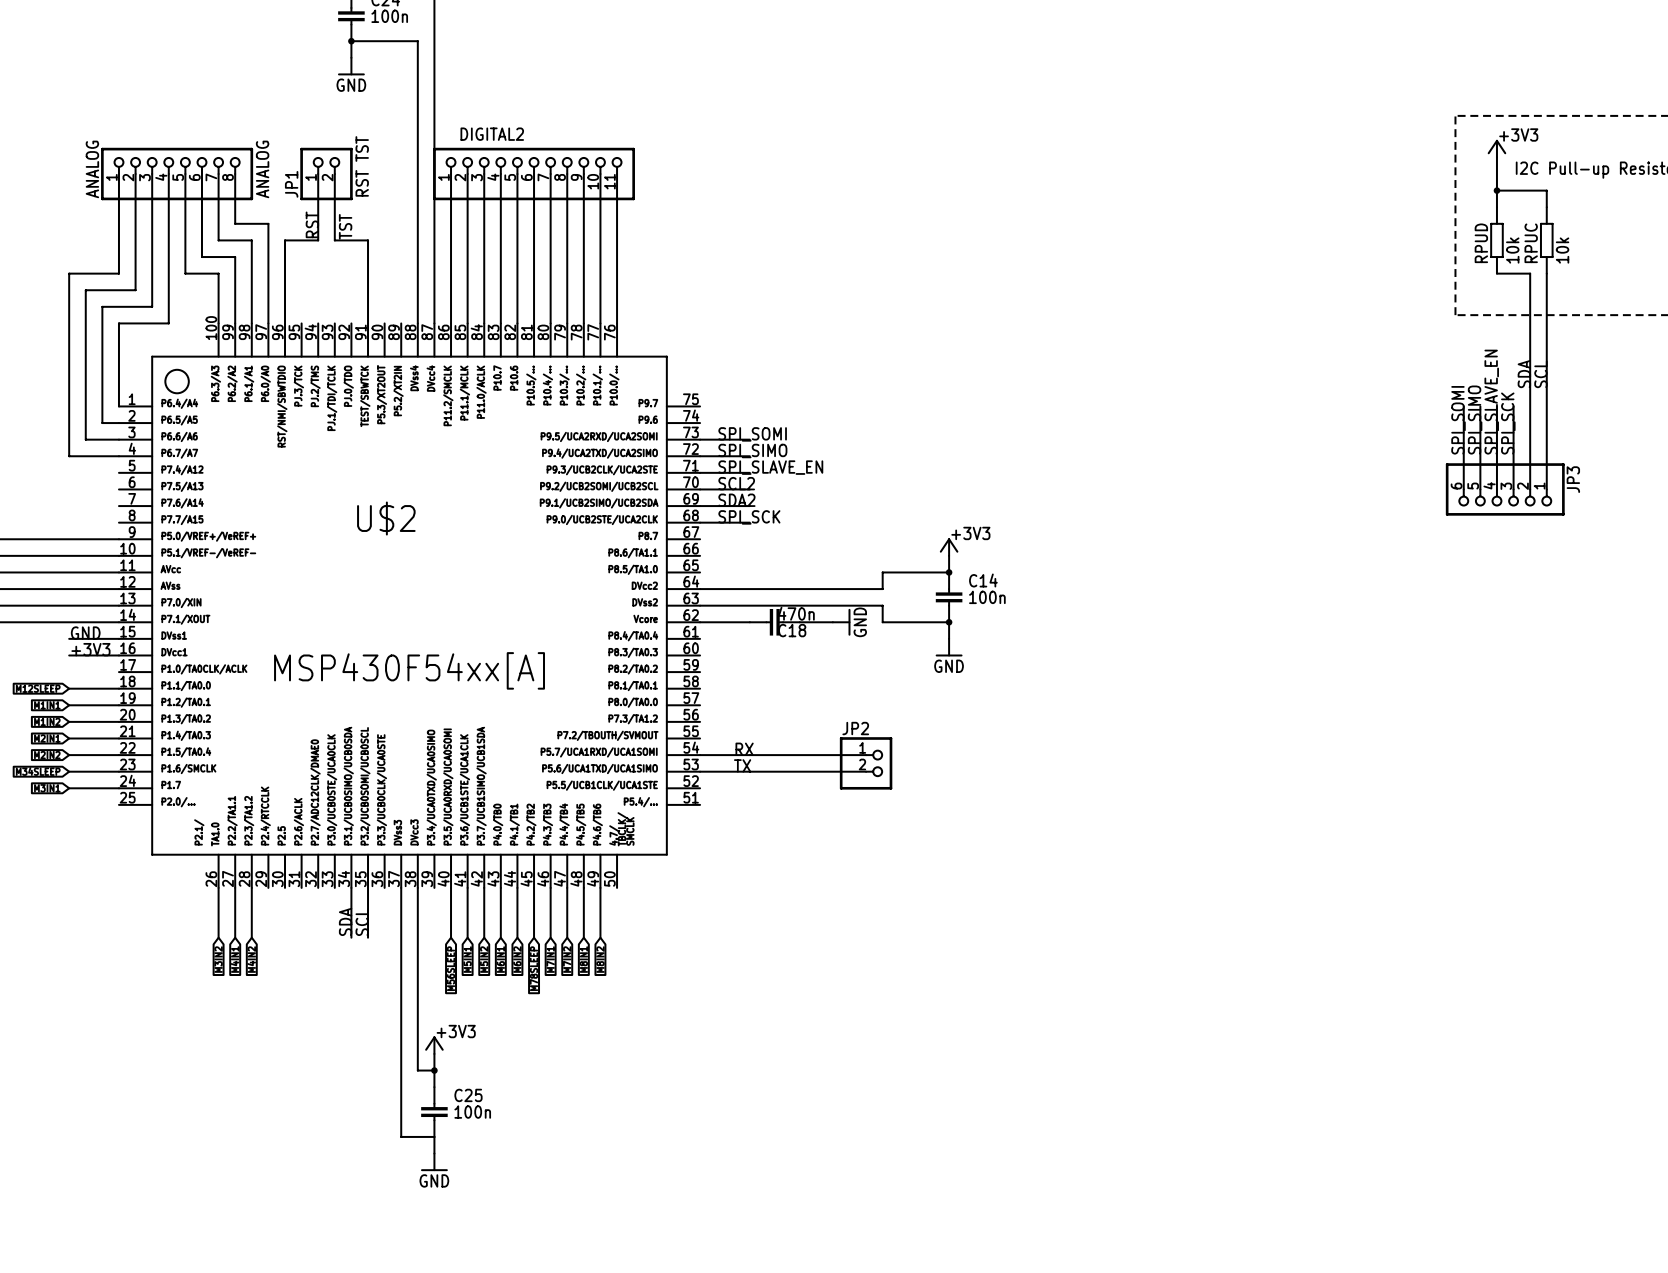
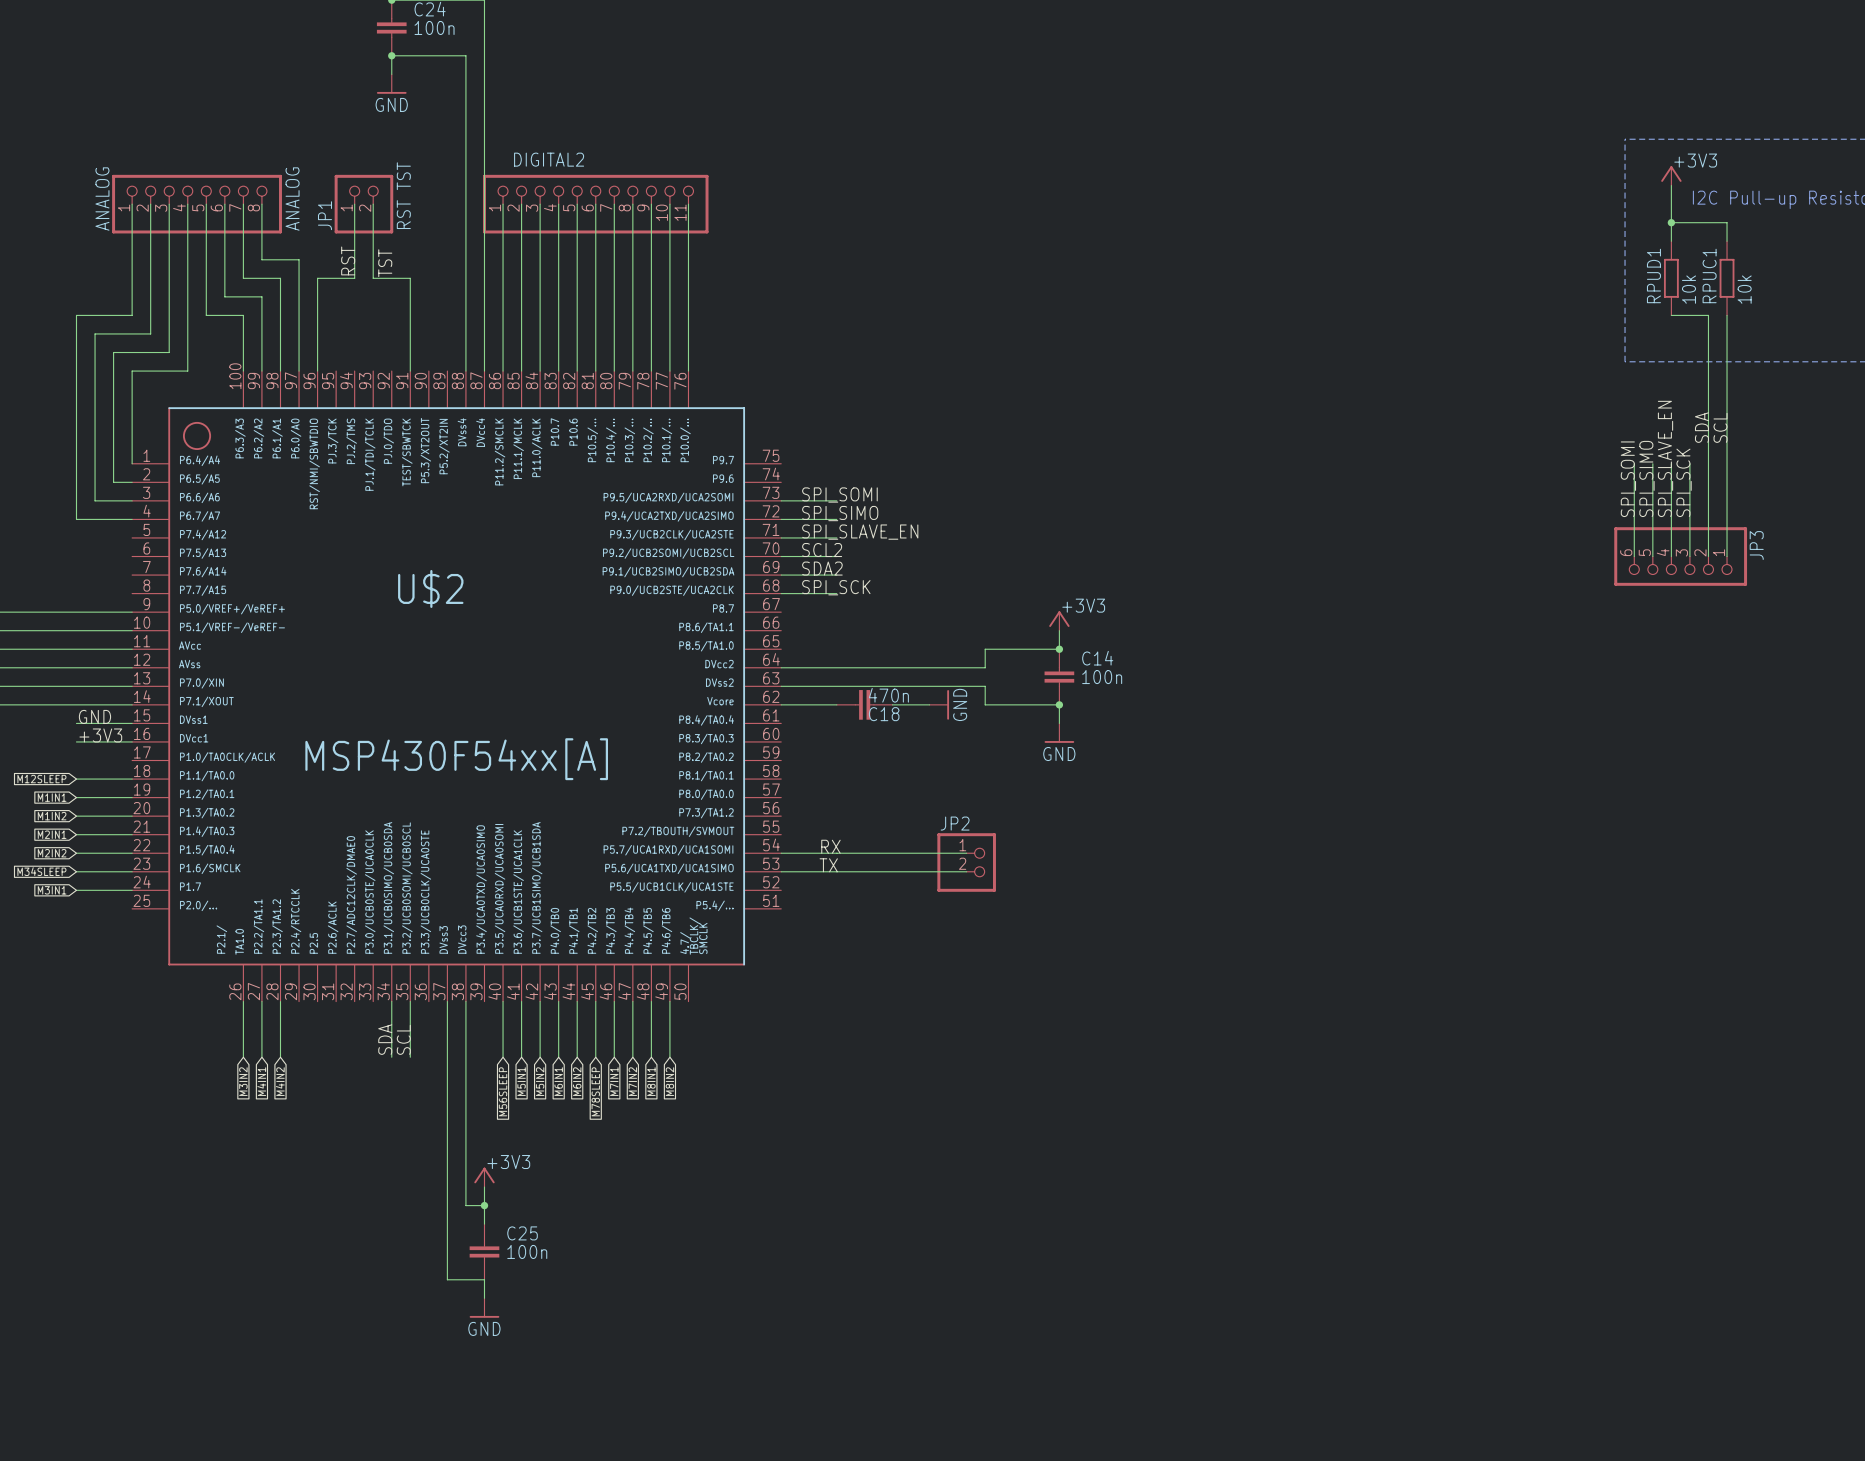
RPUD name: RPUD (1481, 243) -> RPUD1 (1653, 275)
RPUC name: RPUC (1531, 243) -> RPUC1 (1709, 275)

